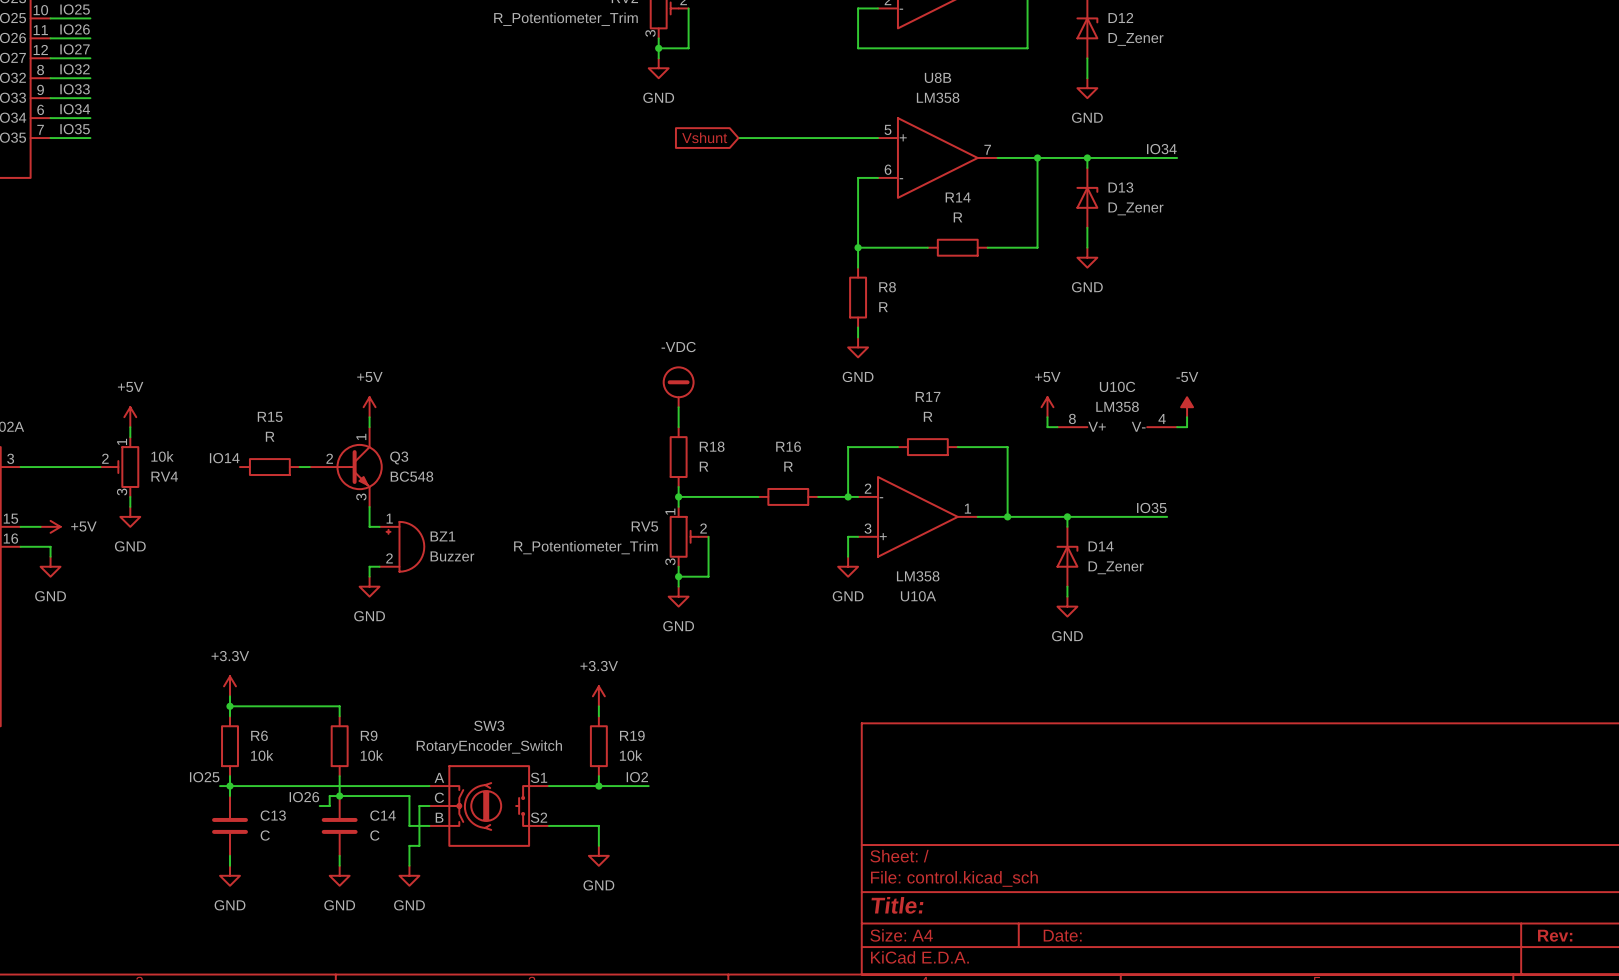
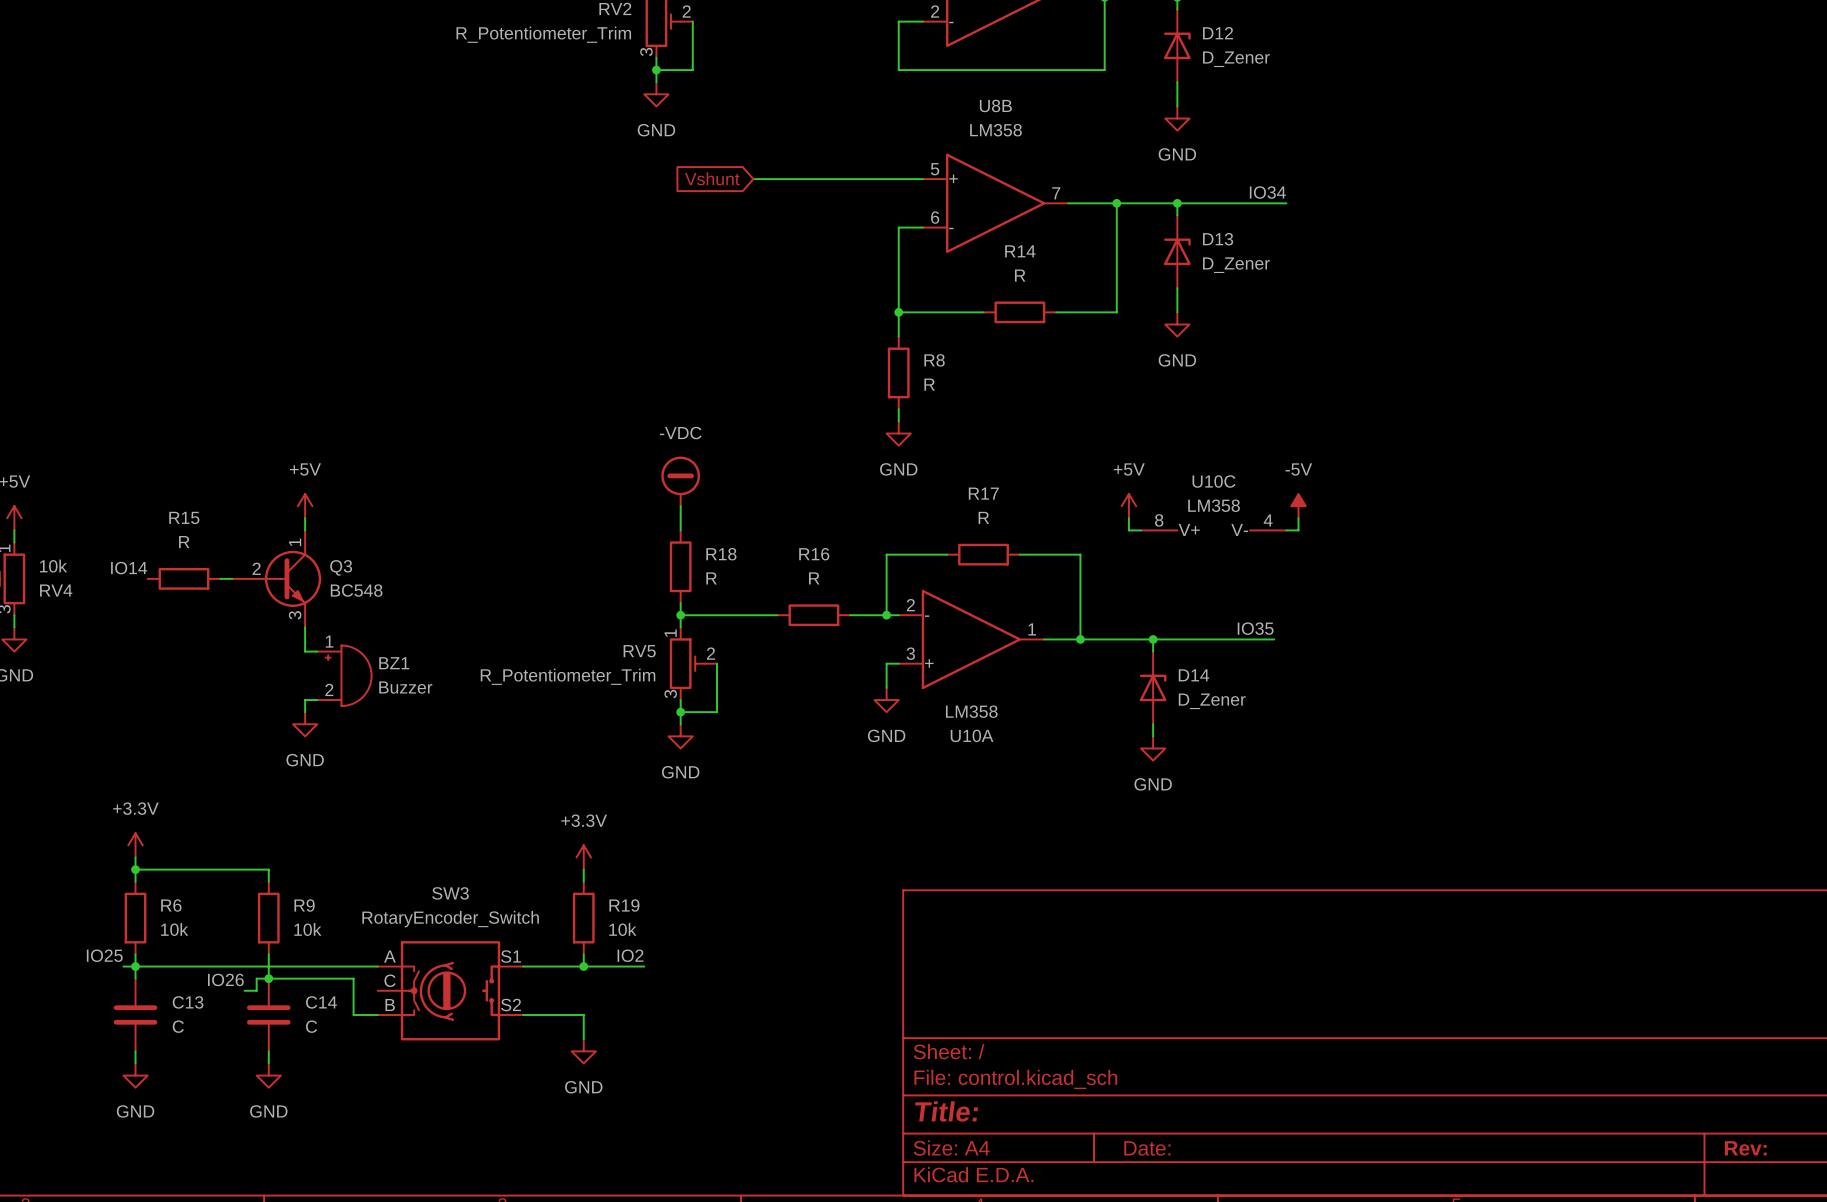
wire: (429, 806) (419, 806) (419, 845) (409, 845) (409, 865) -> none
power symbol: GND (409, 875) -> none

